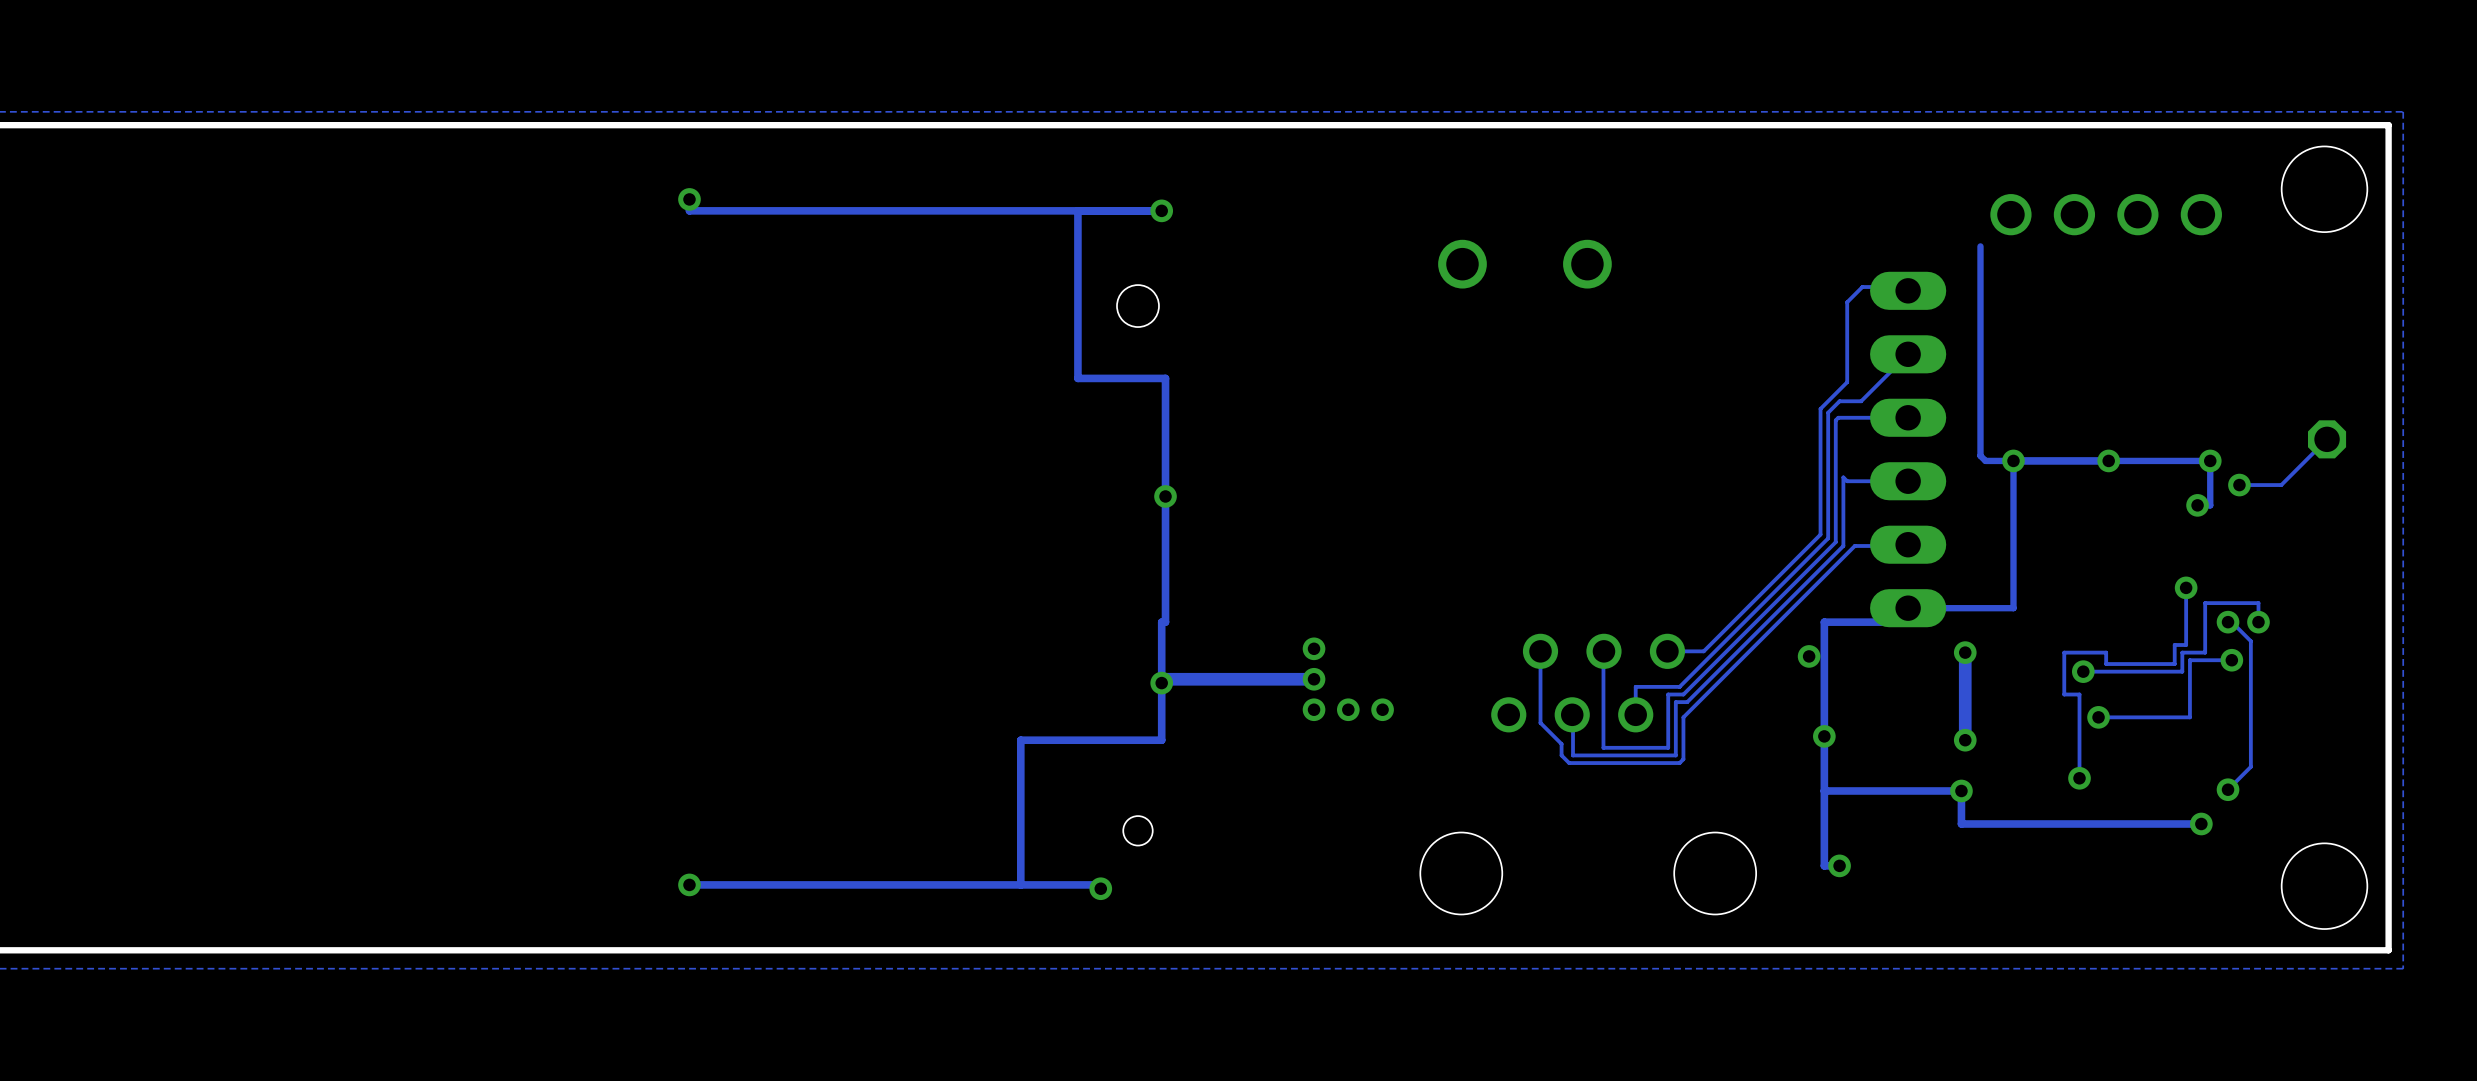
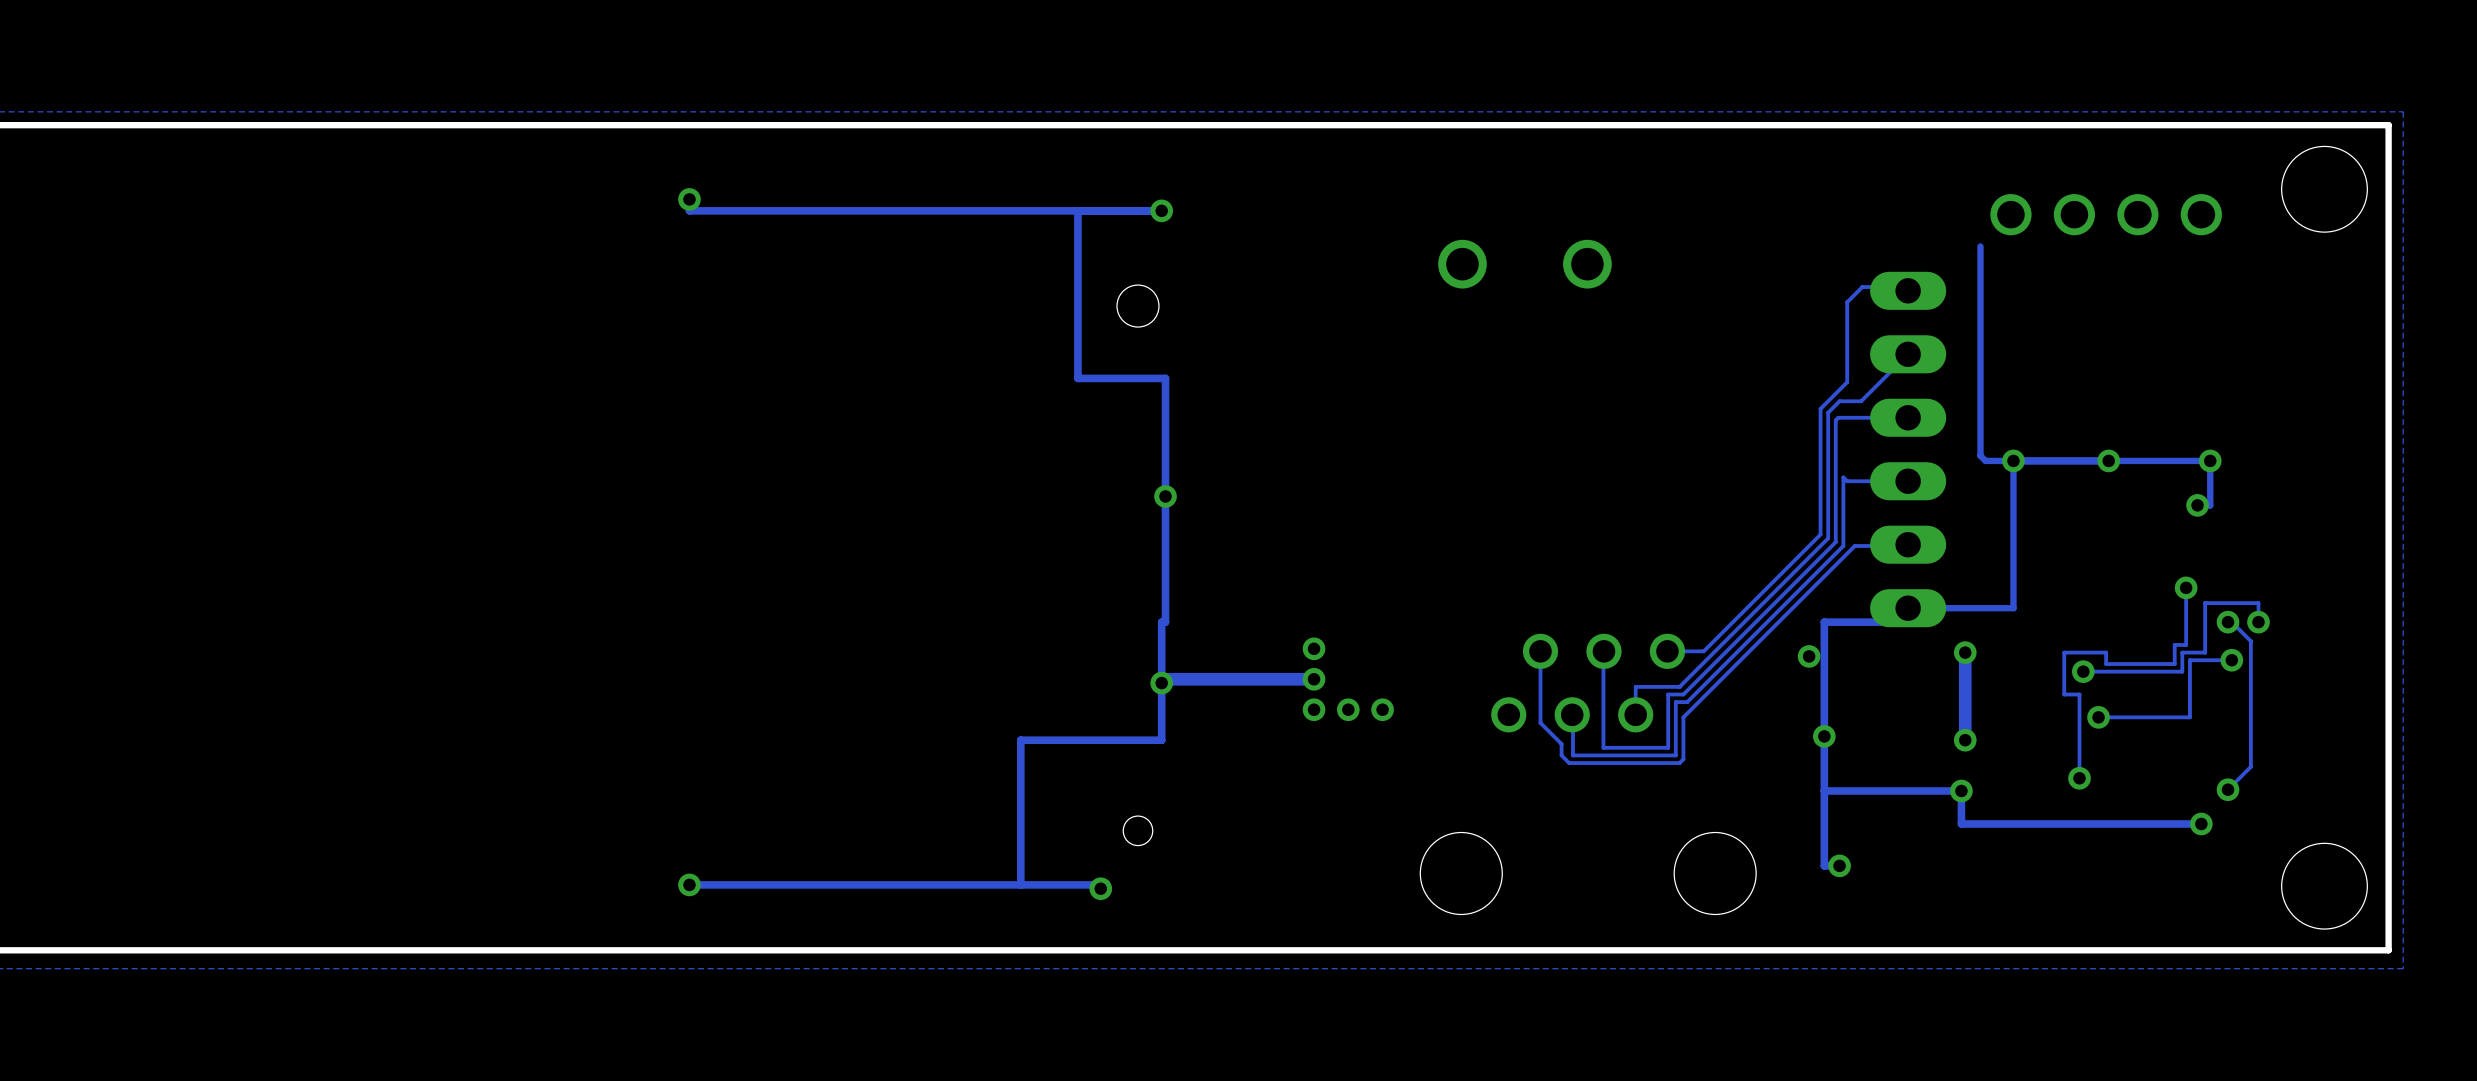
track: (2327, 439) (2281, 485) (2239, 485) -> none
part: (2327, 439) -> none
via: (2239, 485) -> none

